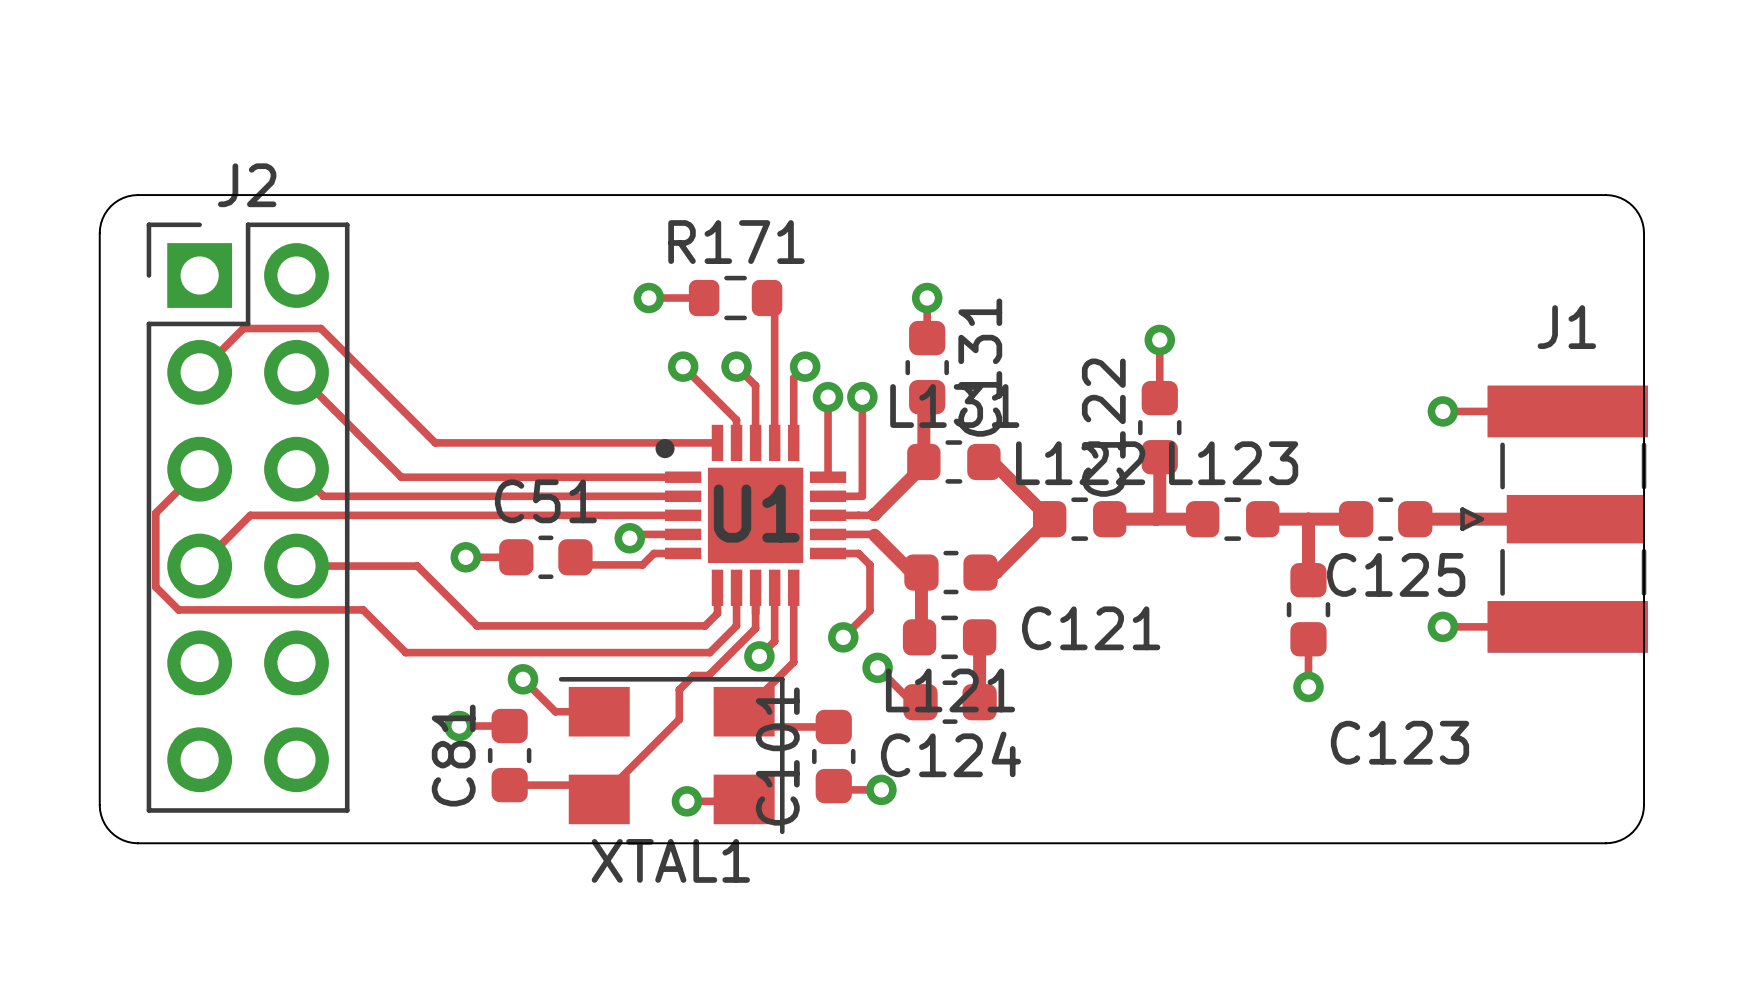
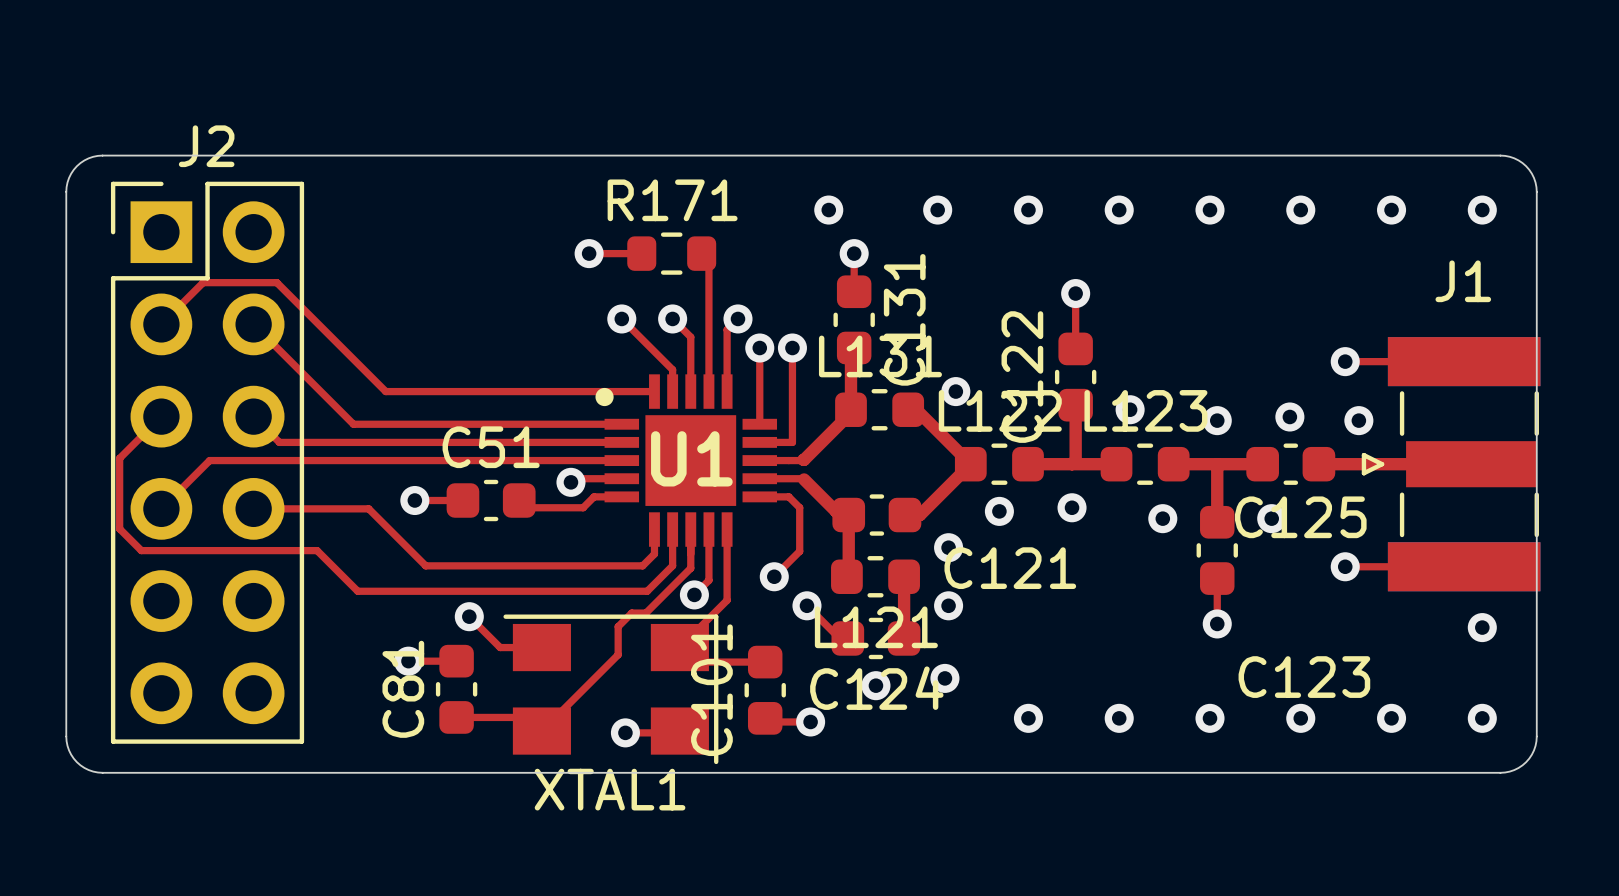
via: none -> (828, 210)
via: none -> (937, 210)
via: none -> (1028, 210)
via: none -> (1119, 210)
via: none -> (1210, 210)
via: none -> (1300, 210)
via: none -> (1391, 210)
via: none -> (1482, 210)
via: none -> (955, 391)
via: none -> (1130, 409)
via: none -> (1289, 416)
via: none -> (1217, 420)
via: none -> (1358, 420)
via: none -> (1072, 507)
via: none -> (999, 511)
via: none -> (1162, 518)
via: none -> (1271, 518)
via: none -> (948, 547)
via: none -> (948, 605)
via: none -> (1482, 627)
via: none -> (944, 678)
via: none -> (875, 685)
via: none -> (1028, 718)
via: none -> (1119, 718)
via: none -> (1210, 718)
via: none -> (1300, 718)
via: none -> (1391, 718)
via: none -> (1482, 718)

